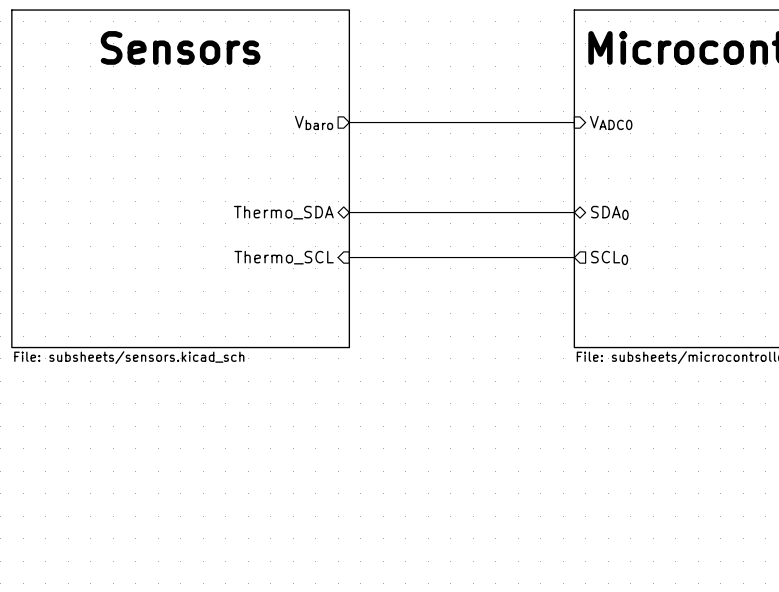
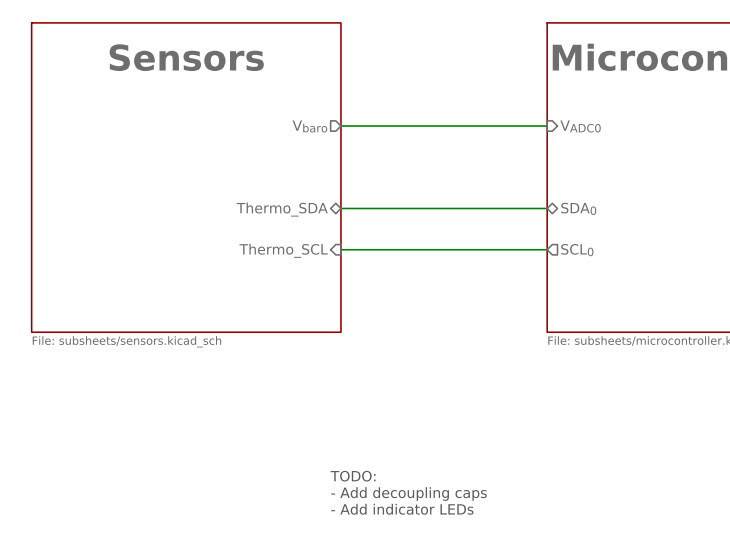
text: none -> TODO: (353, 476)
text: none -> - Add decoupling caps (409, 494)
text: none -> - Add indicator LEDs (402, 509)

